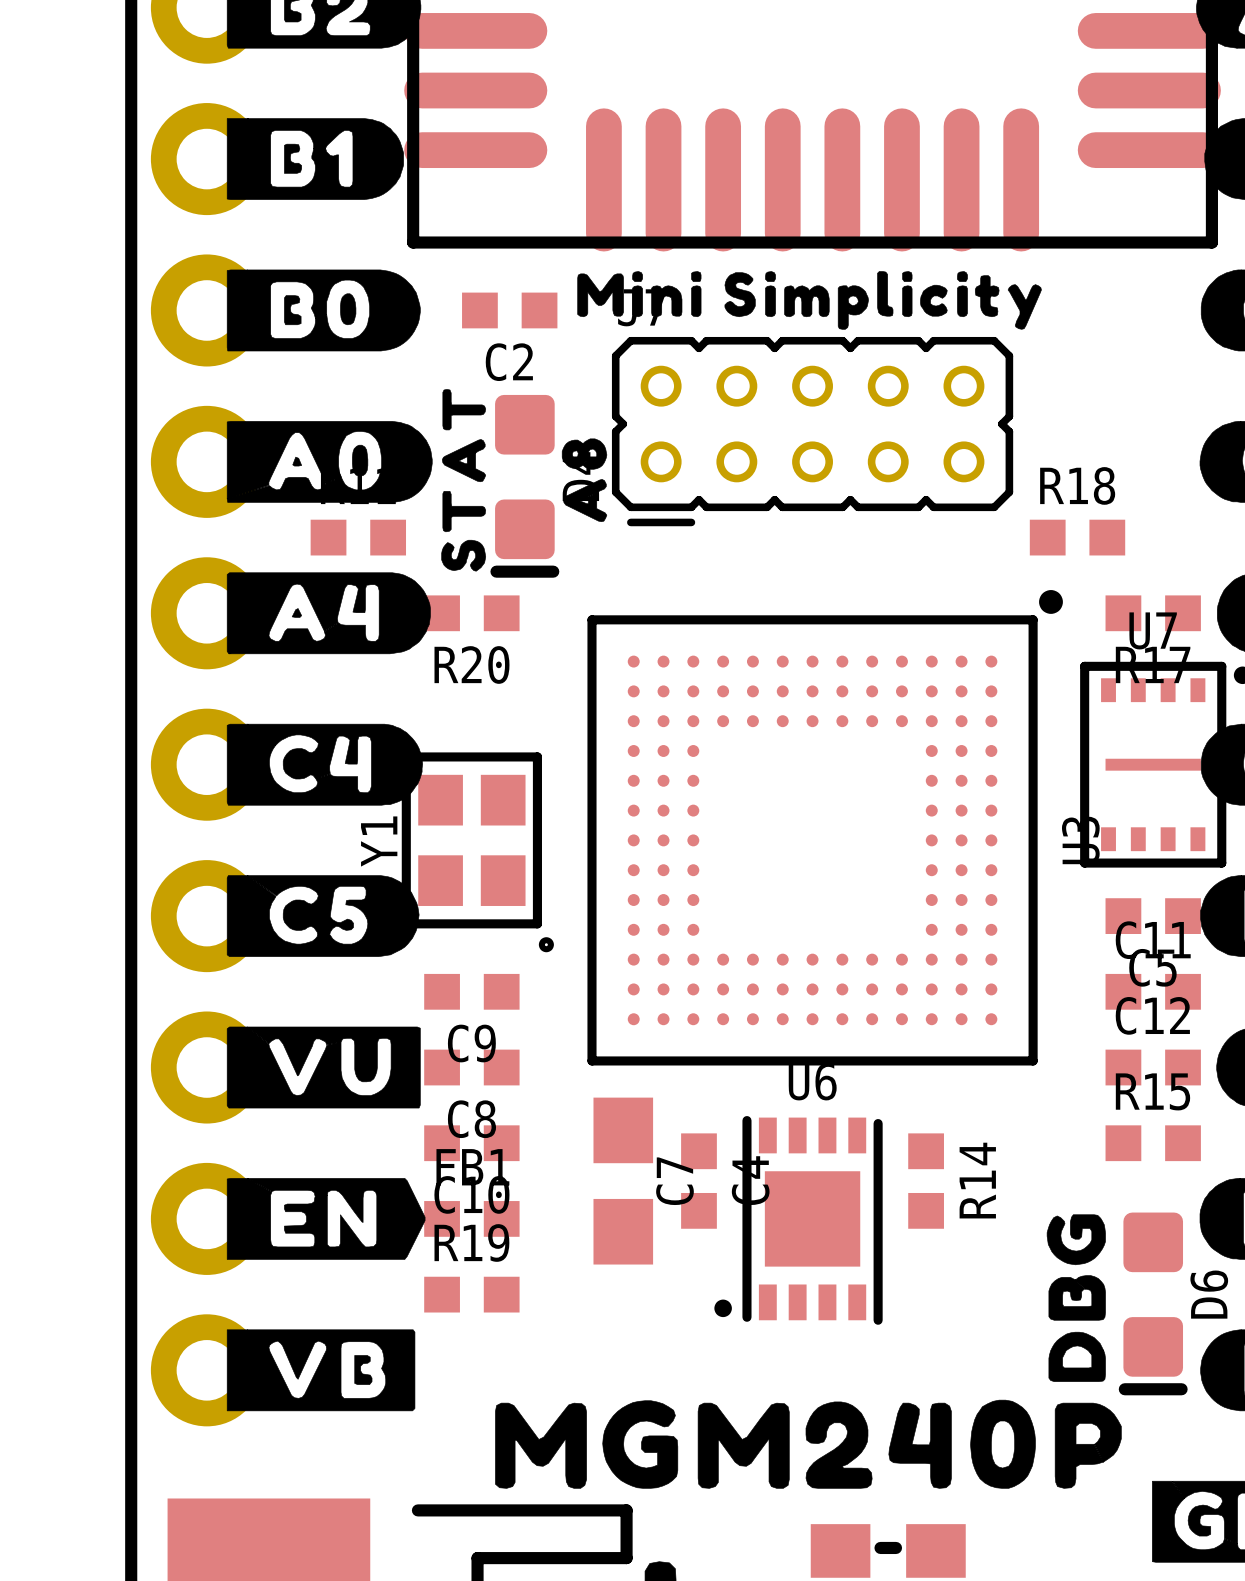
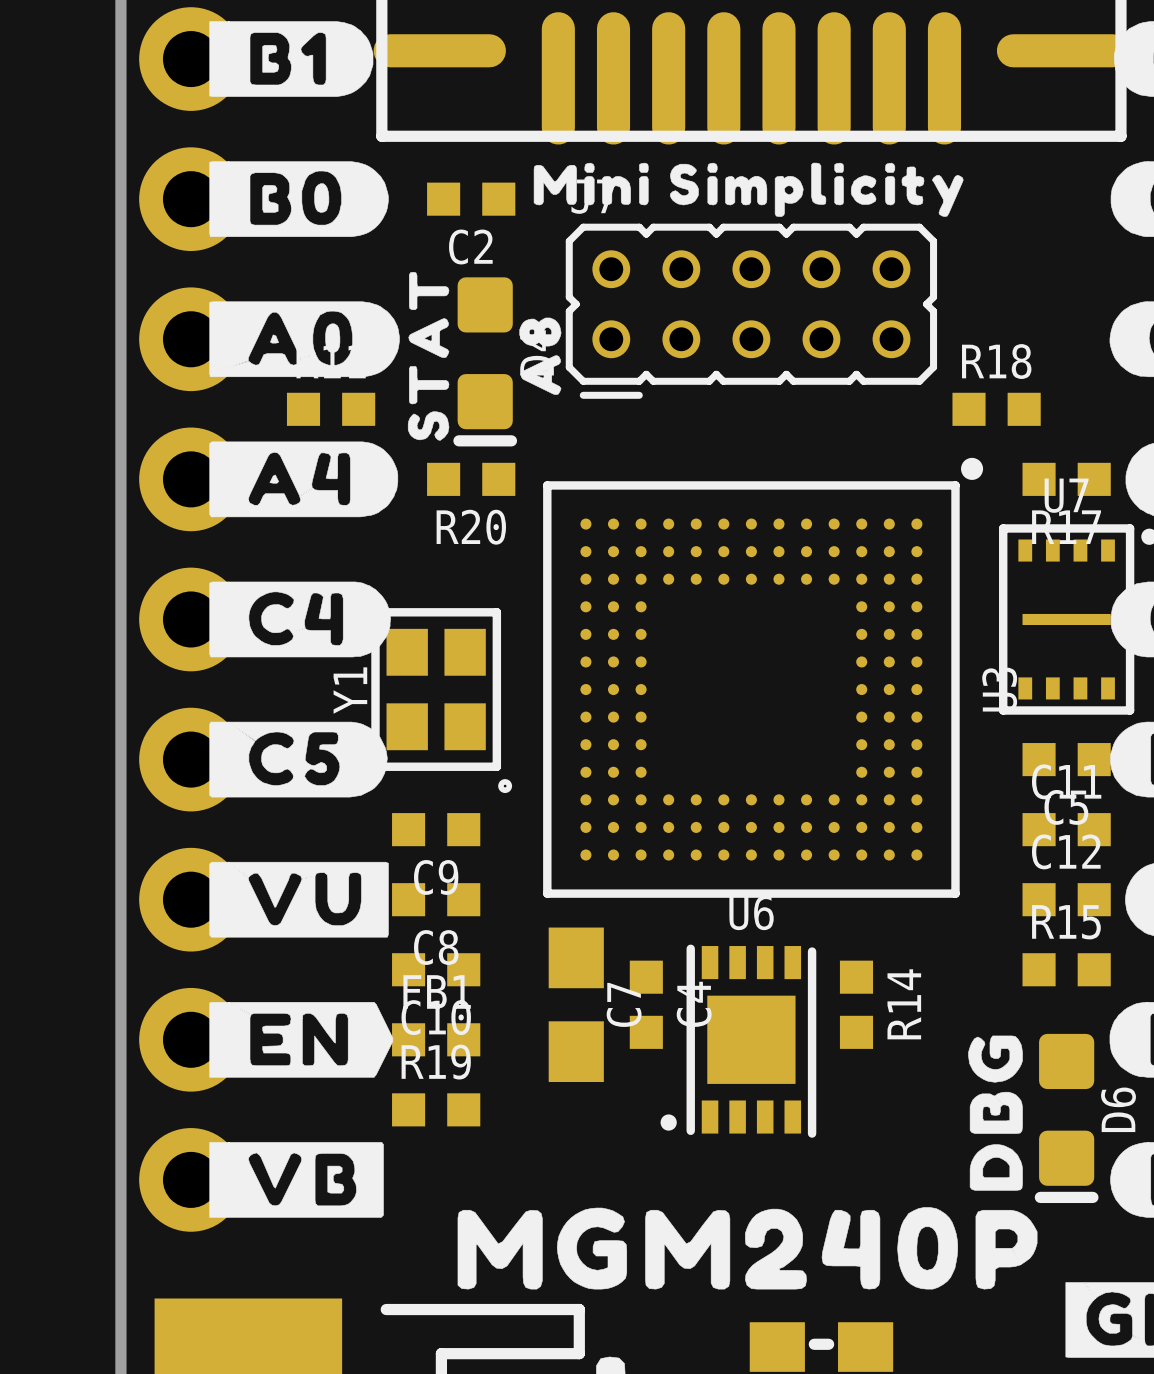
R20 position: (471, 613) -> (471, 479)

